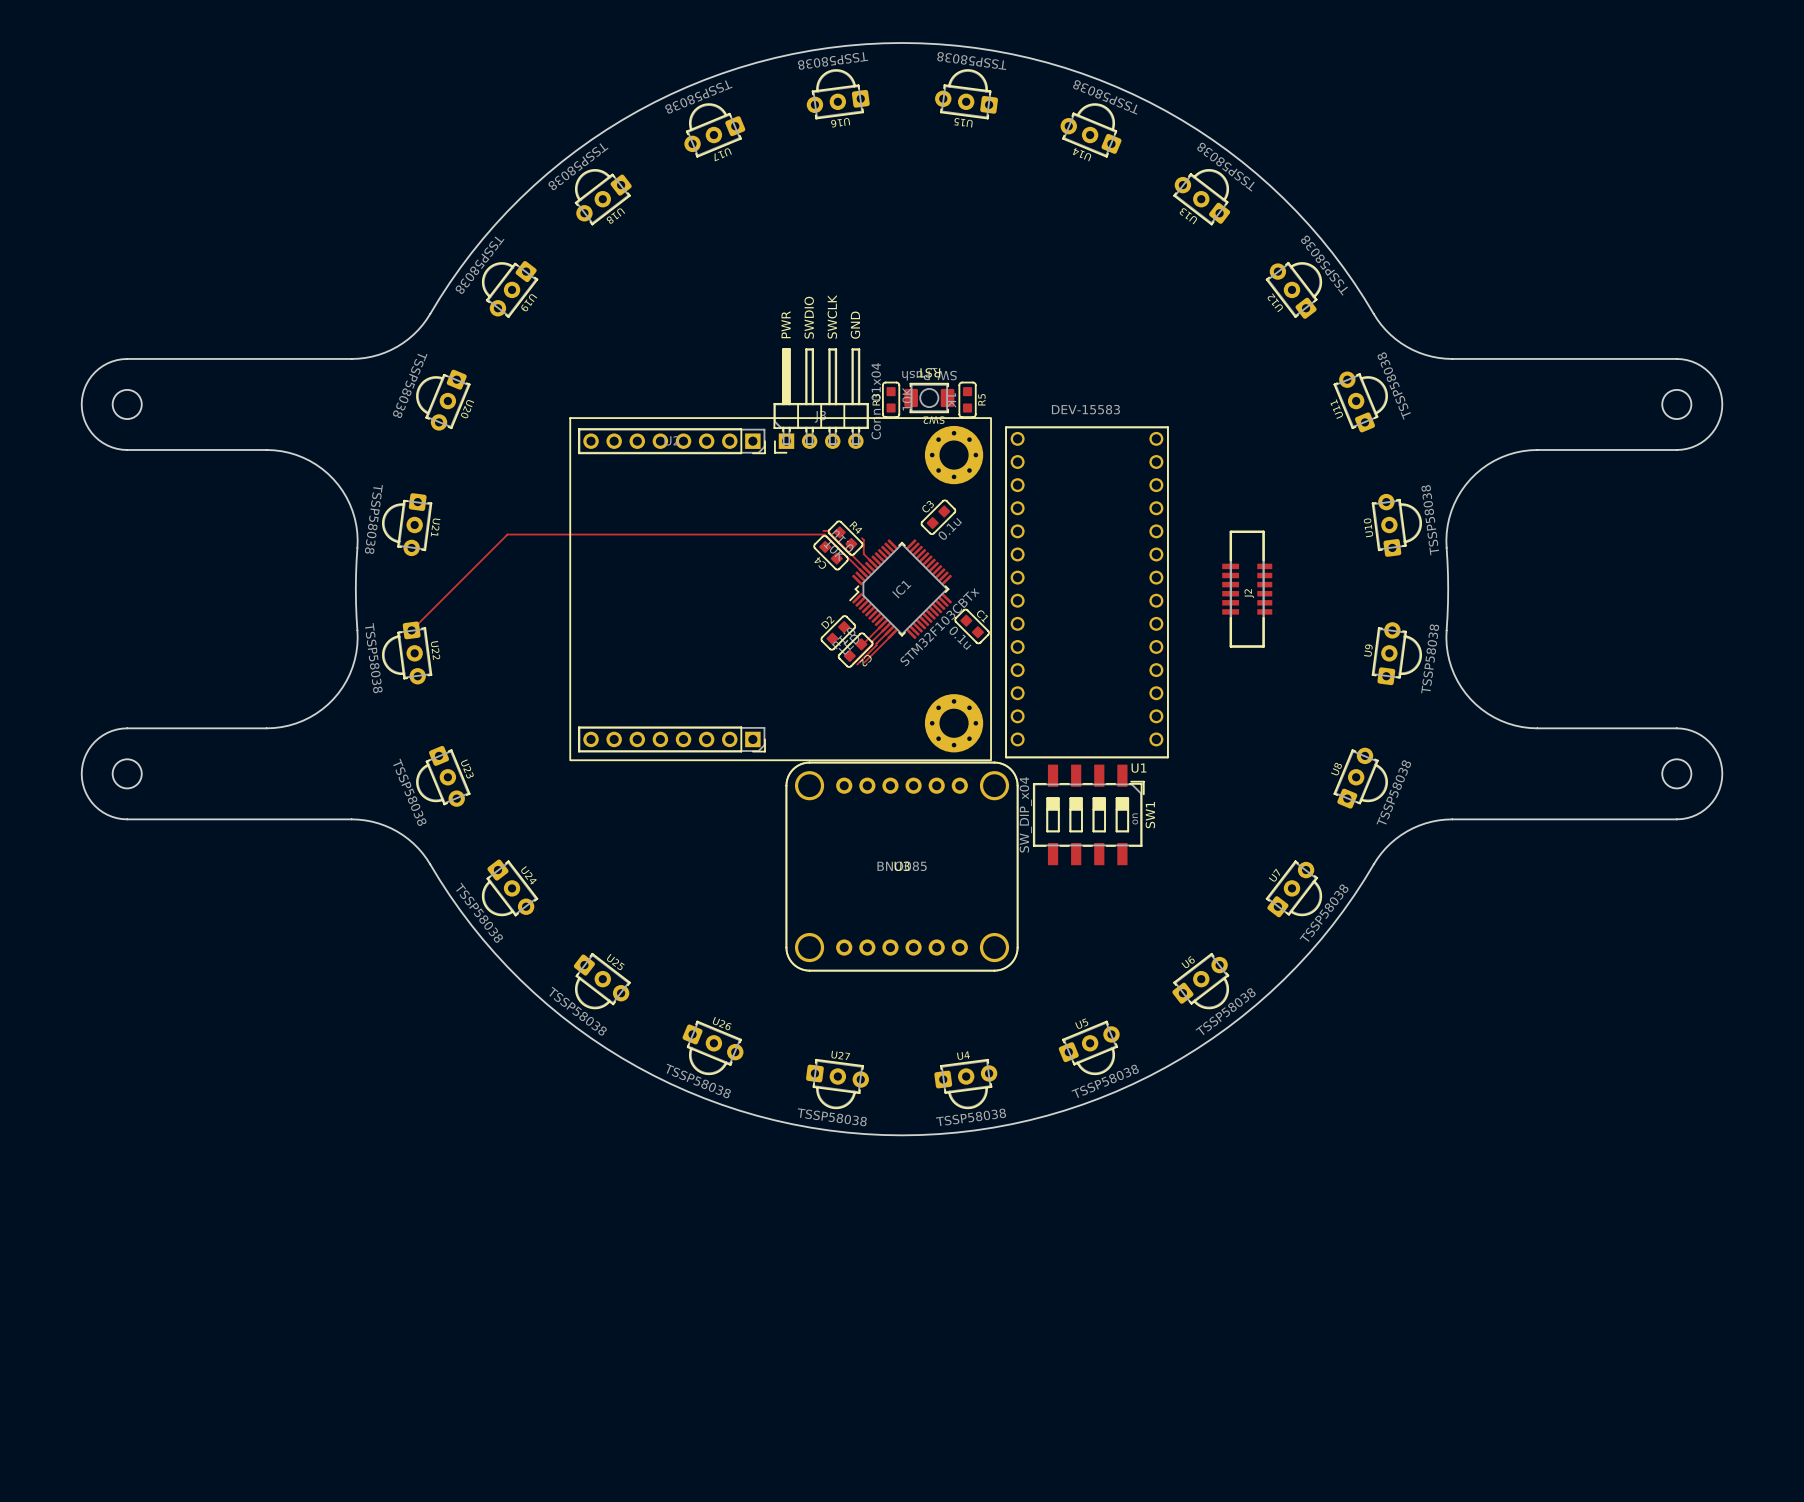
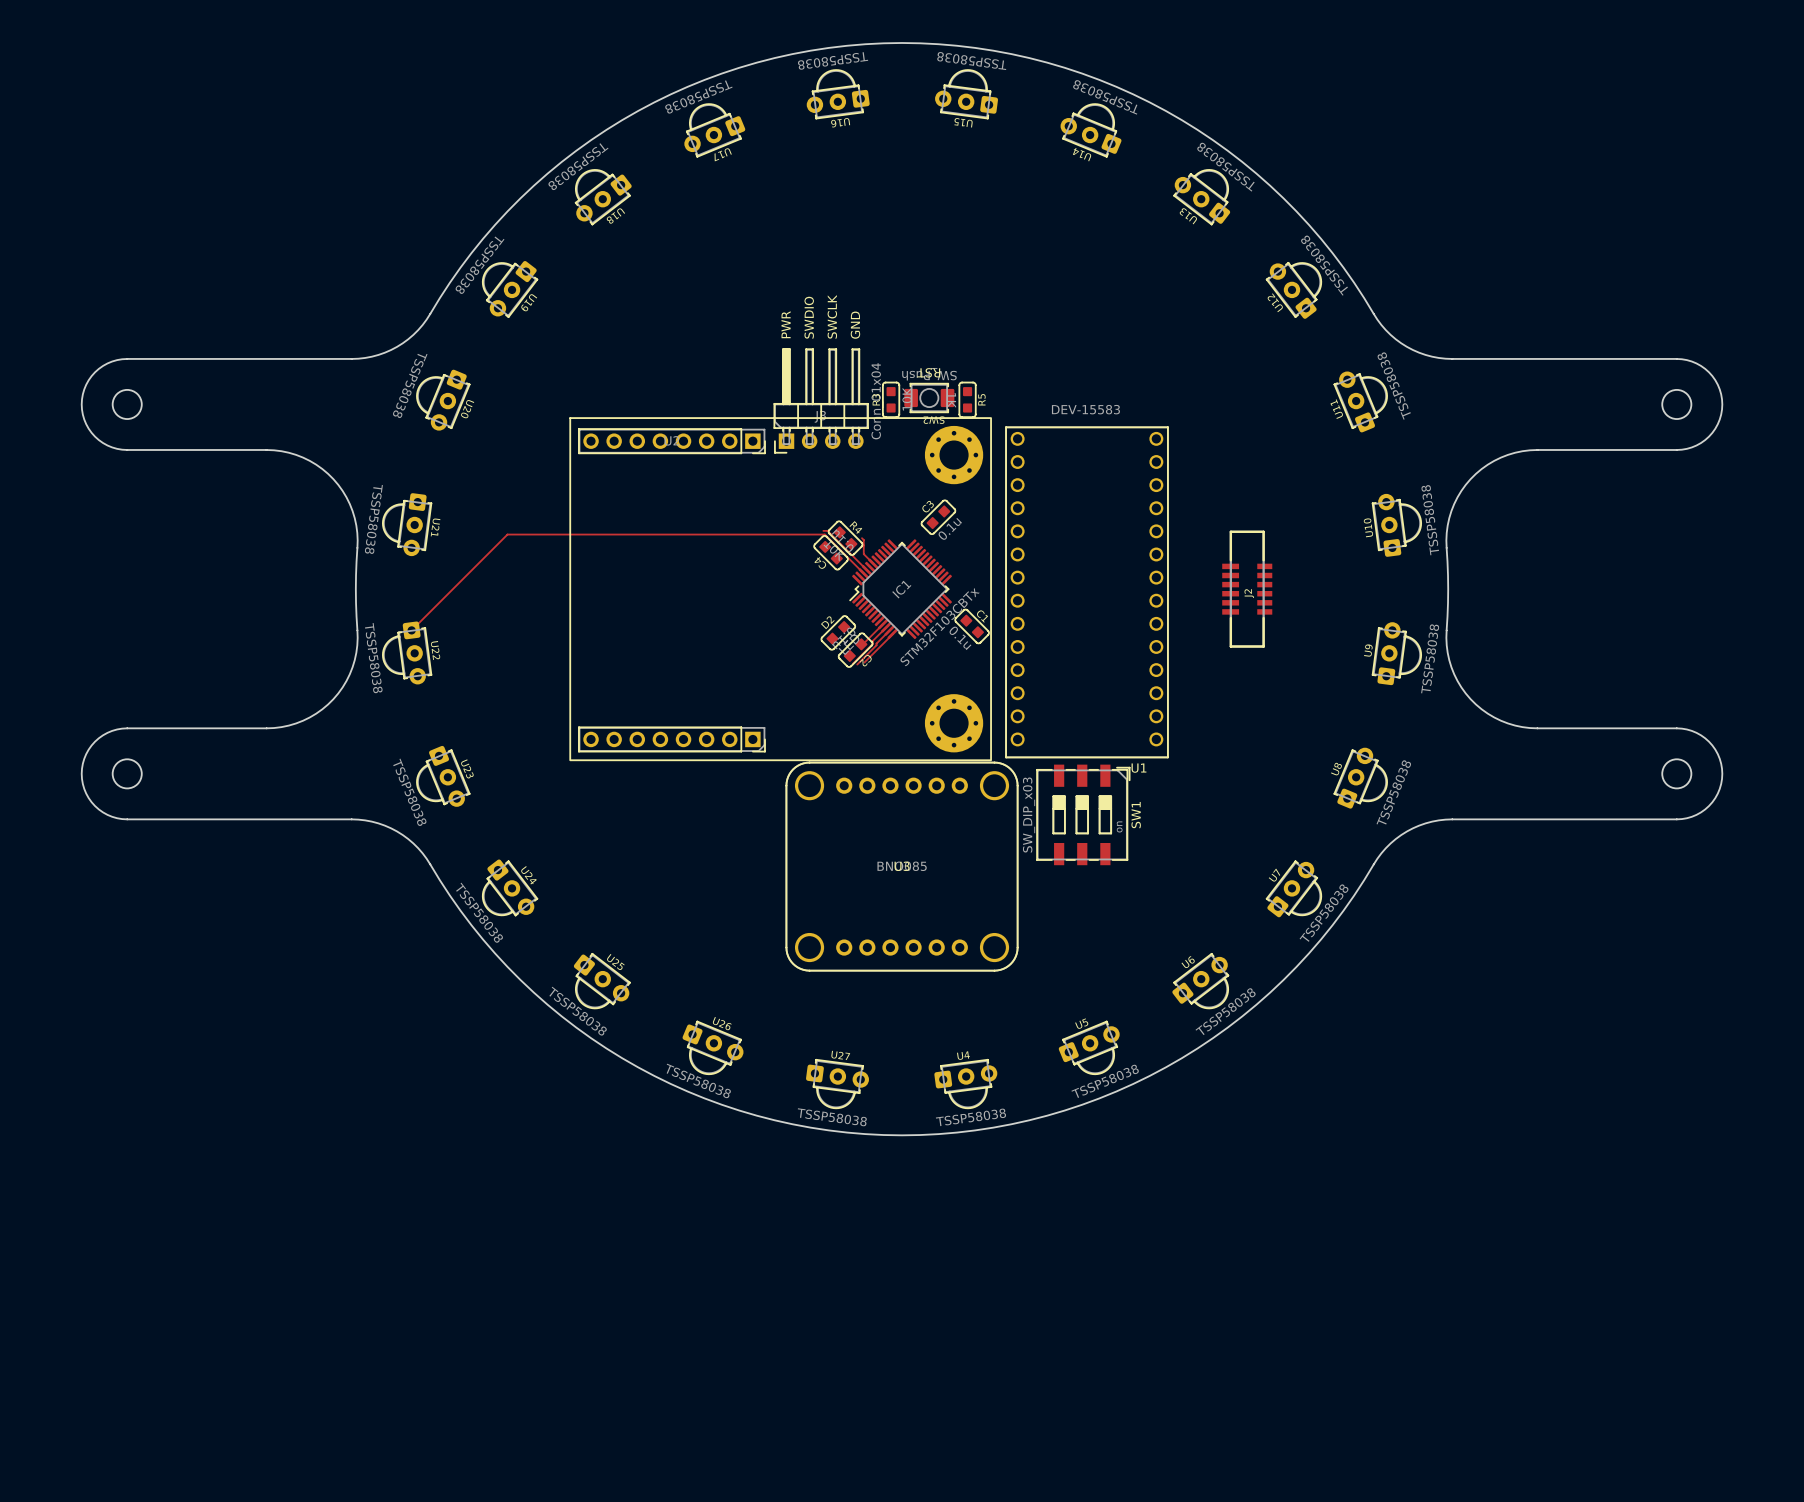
SW1 footprint: [1033, 764, 1145, 866] -> [1036, 764, 1131, 866]
SW1 value: SW_DIP_x04 (1025, 814) -> SW_DIP_x03 (1029, 815)

